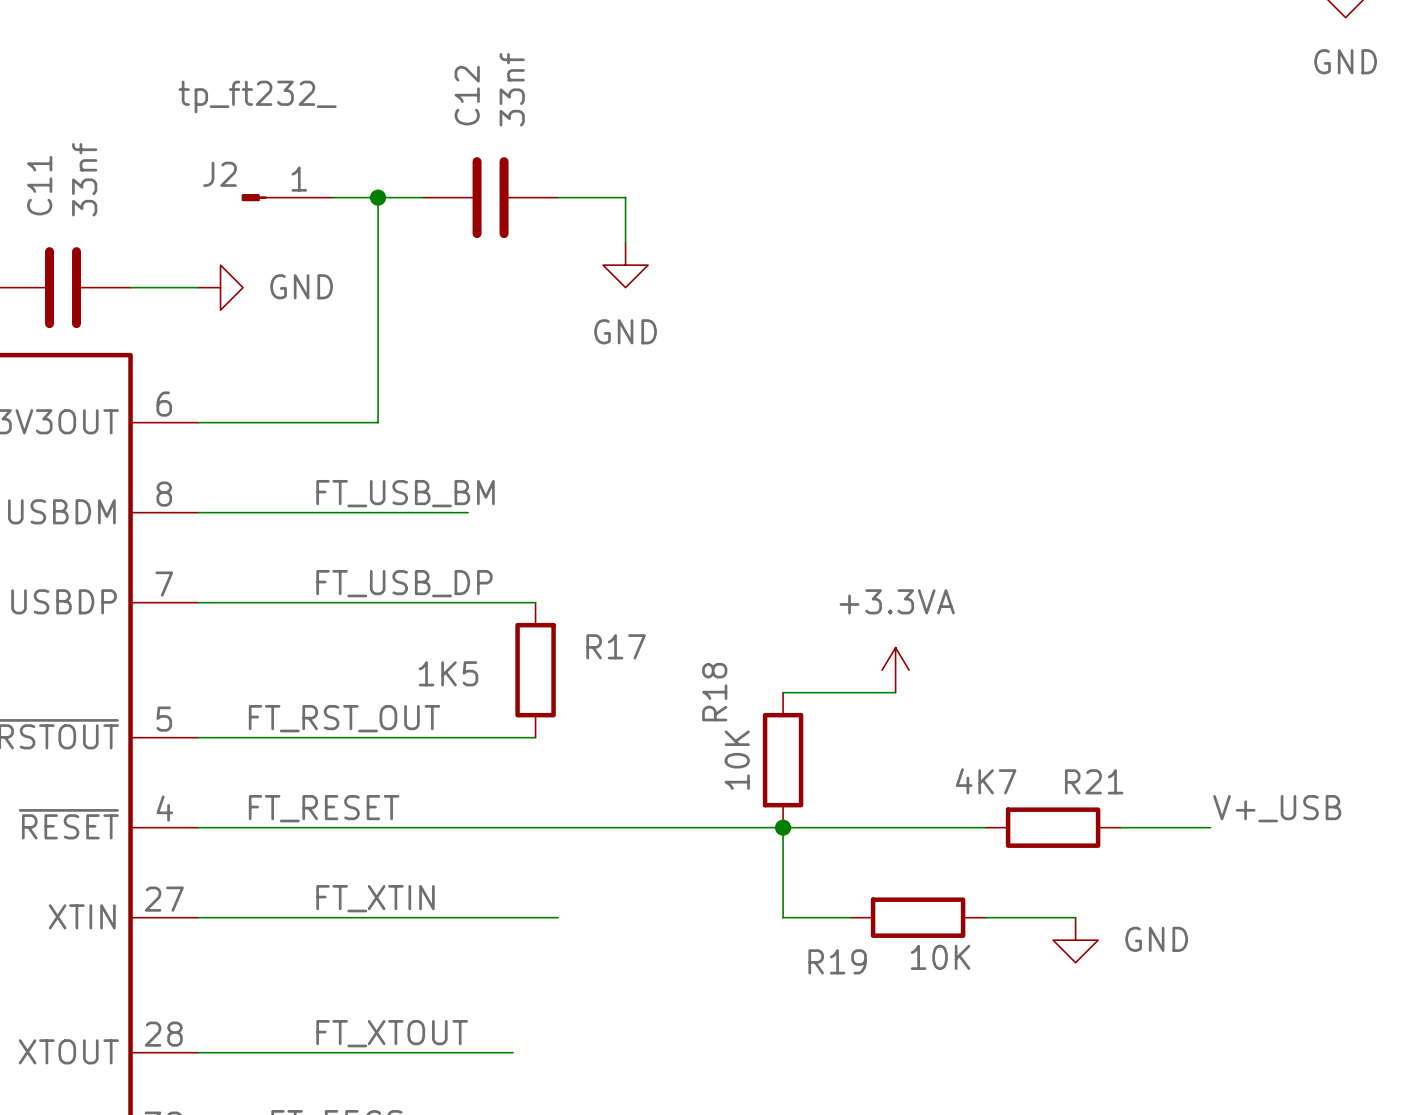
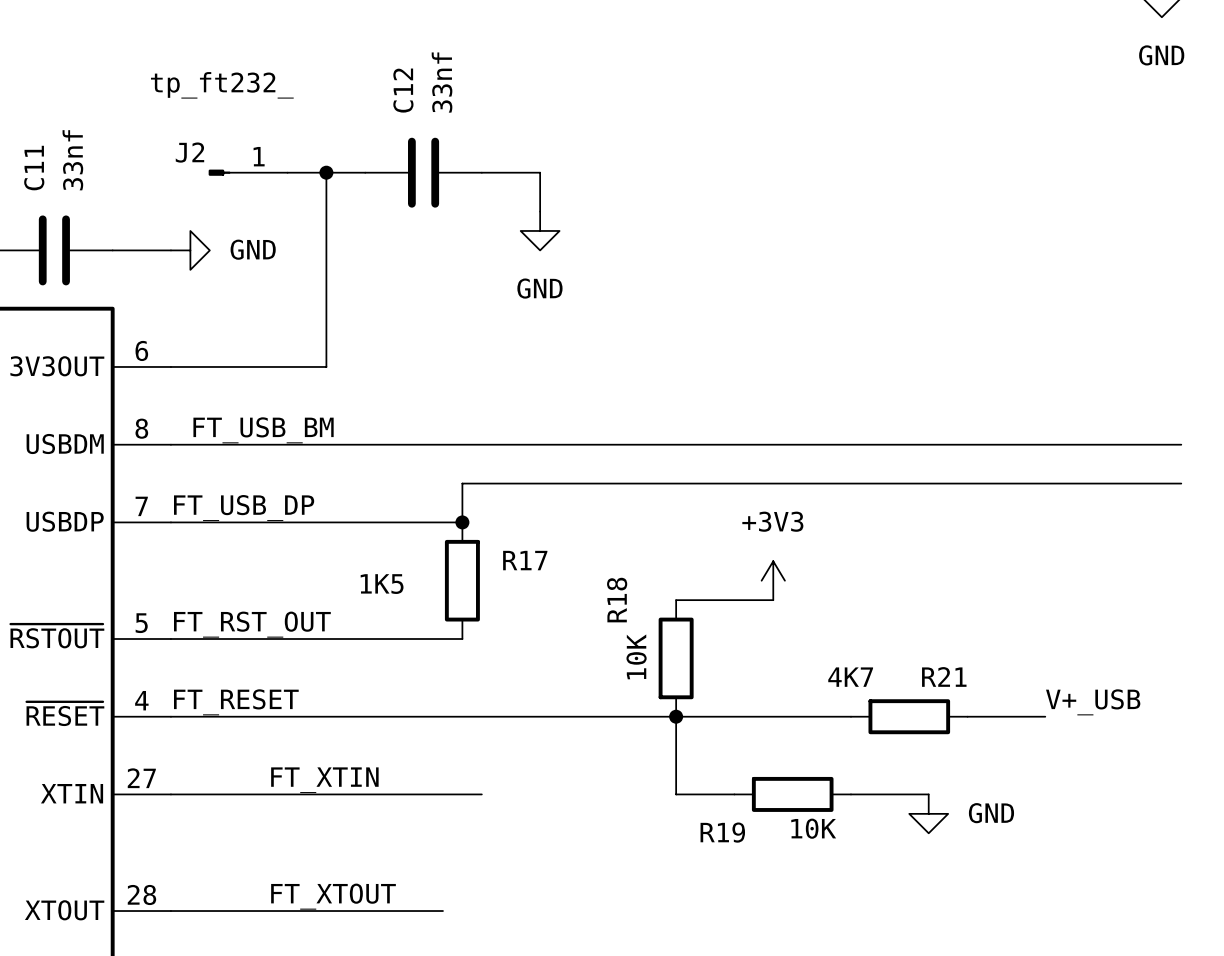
label position: FT_USB_BM (405, 493) -> FT_USB_BM (263, 430)
wire: none -> (404, 444) (1181, 444)
wire: none -> (1181, 483) (462, 483) (462, 522)
label position: FT_USB_DP (404, 583) -> FT_USB_DP (244, 508)
junction: none -> (462, 522)
power symbol: +3.3VA (895, 670) -> +3V3 (773, 580)
label position: FT_RST_OUT (344, 718) -> FT_RST_OUT (252, 624)
label position: FT_RESET (324, 808) -> FT_RESET (236, 702)

